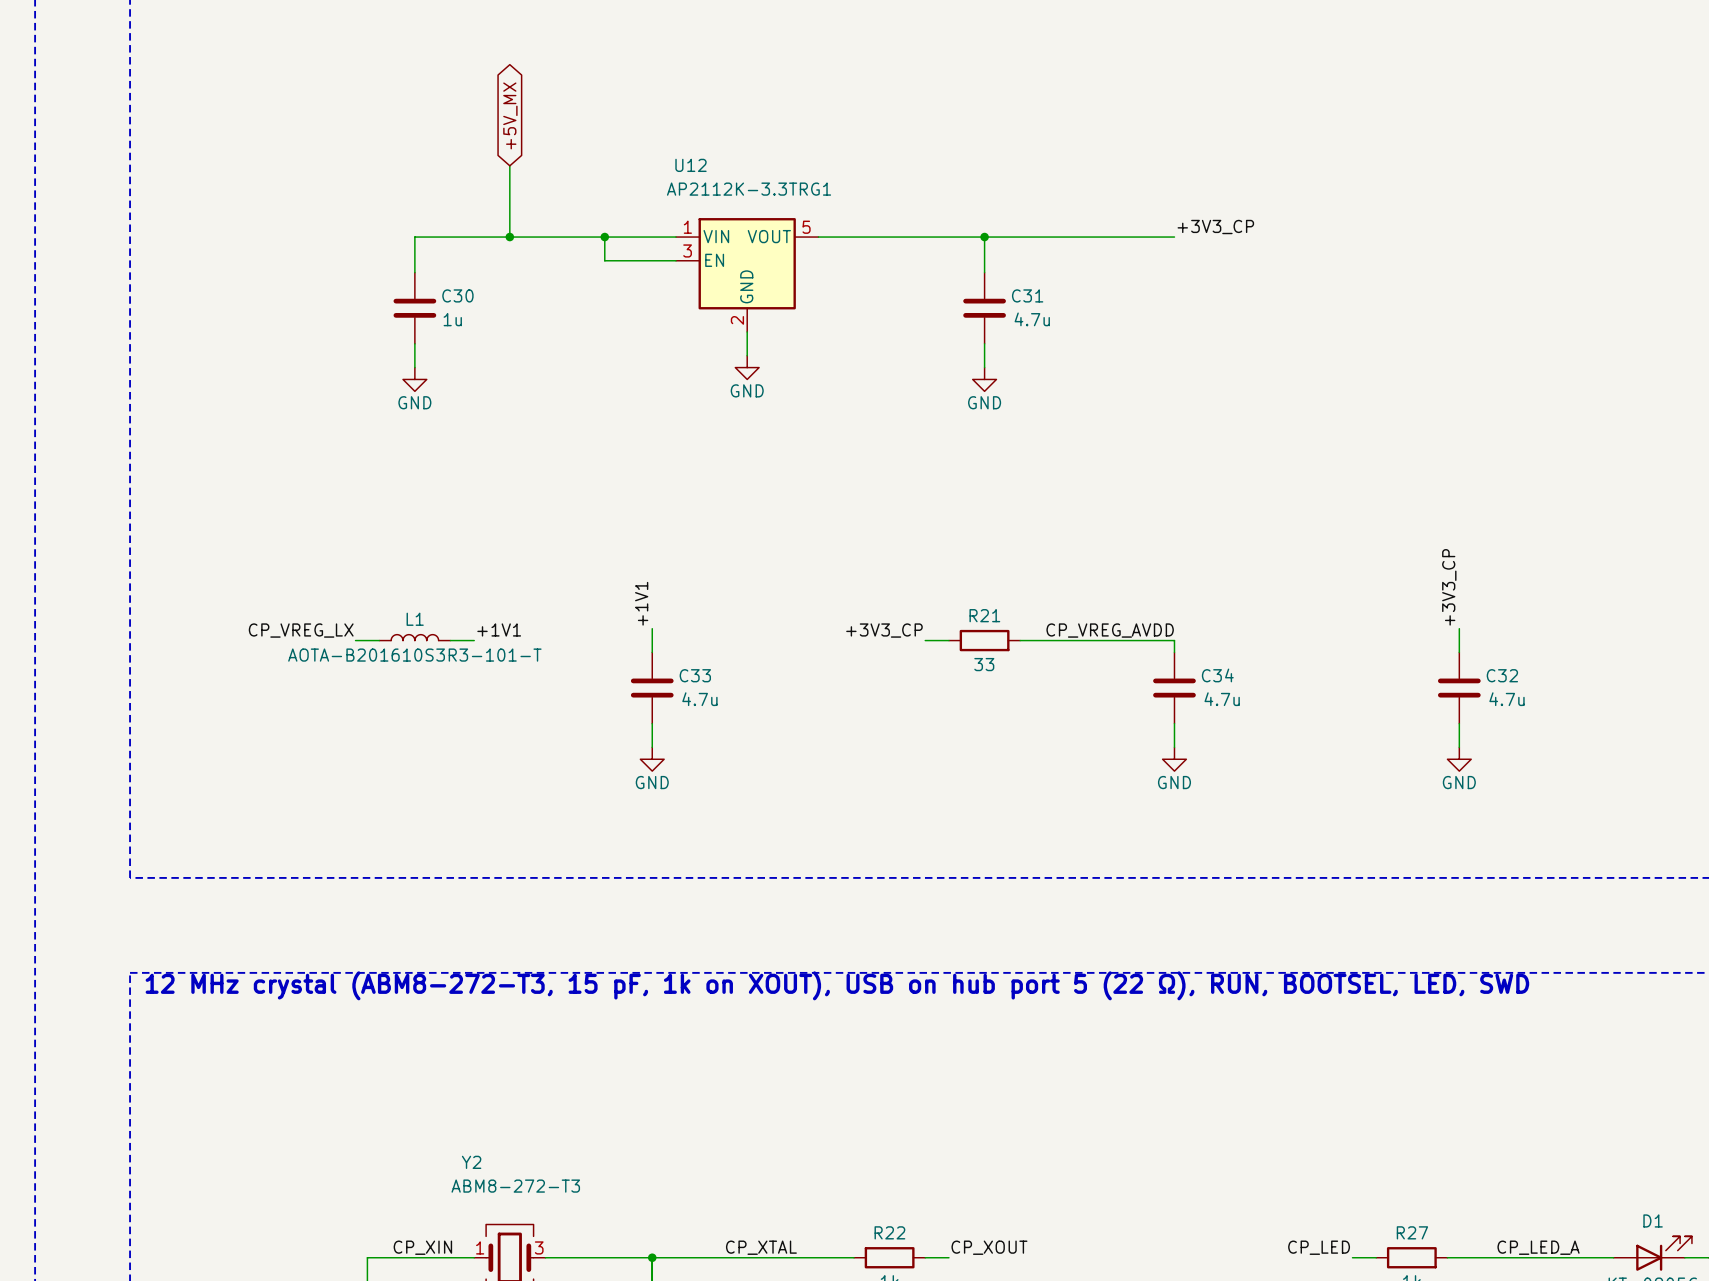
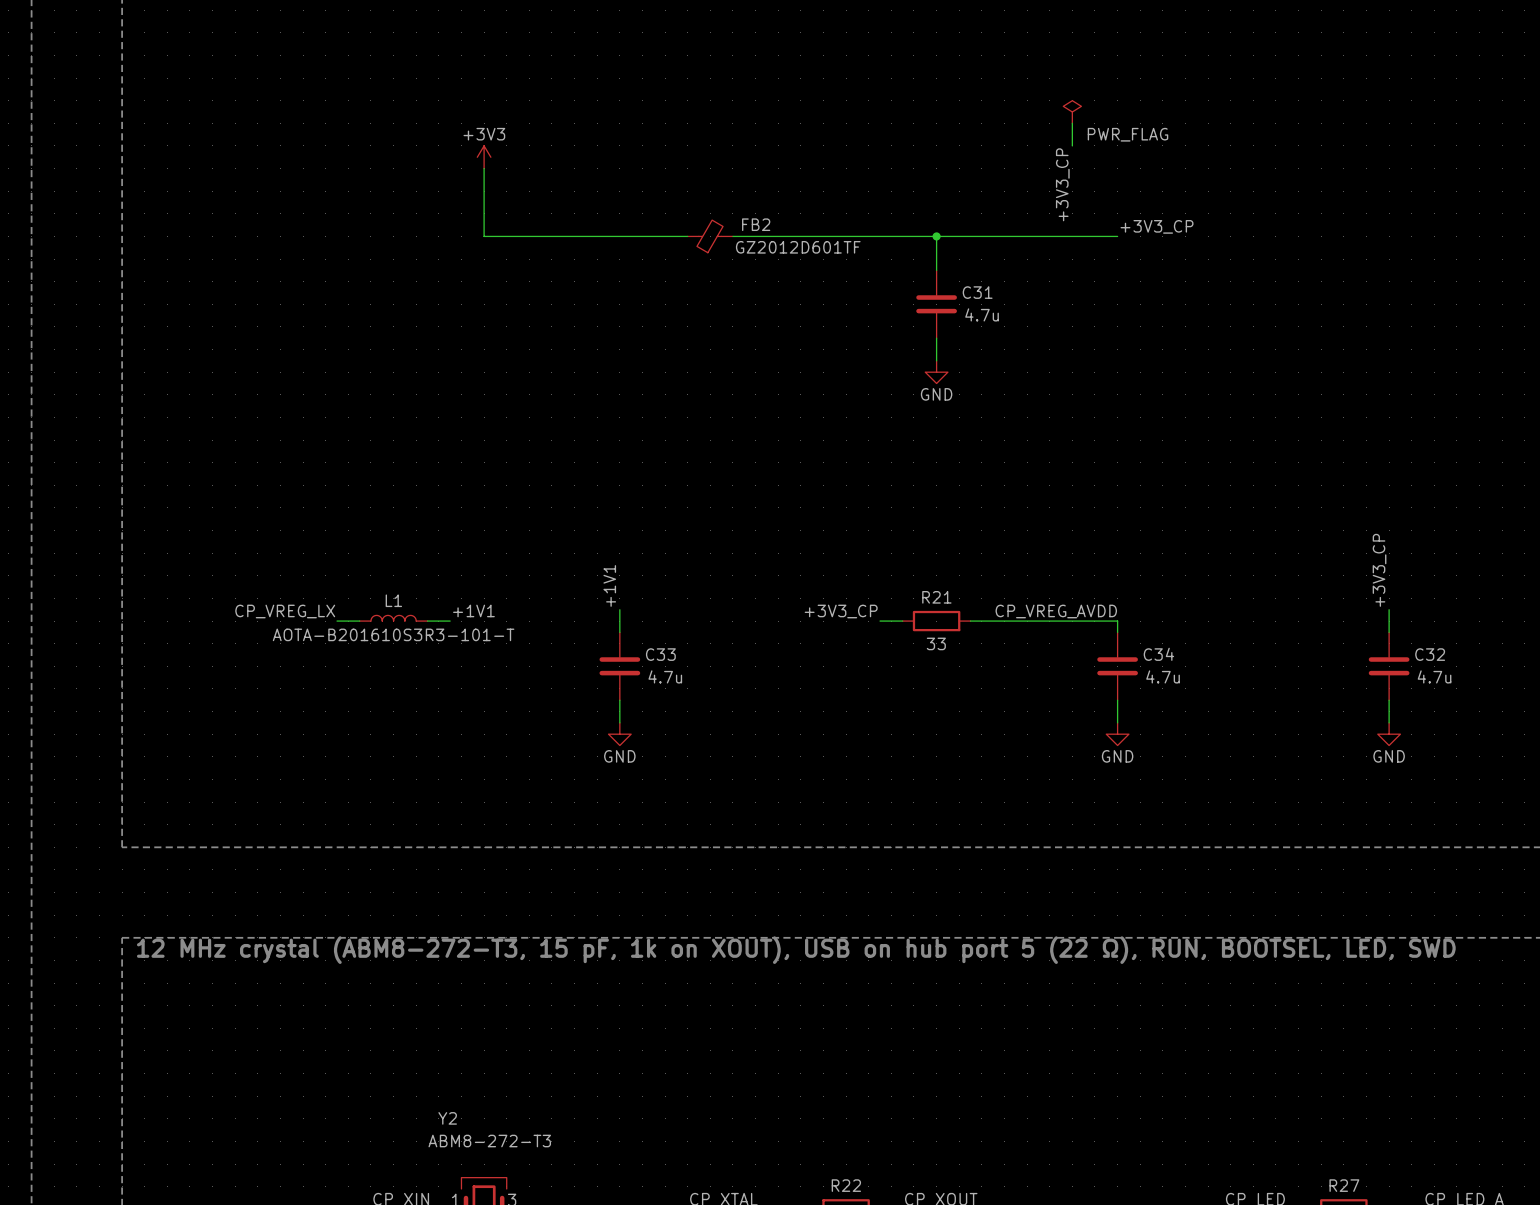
power symbol: none -> PWR_FLAG (1072, 111)
global label: +5V_MX (510, 115) -> none
wire: none -> (1072, 123) (1072, 145)
power symbol: none -> +3V3 (484, 157)
label: none -> +3V3_CP (1062, 184)
wire: (509, 237) (414, 237) (414, 272) -> none
junction: (509, 237) -> none
wire: (604, 237) (604, 260) (675, 260) -> none
junction: (604, 237) -> none
FB2: none -> GZ2012D601TF (710, 236)
U12: AP2112K-3.3TRG1 (747, 275) -> none
C30: 1u (414, 308) -> none
wire: (747, 331) (747, 355) -> none
wire: (414, 343) (414, 367) -> none
power symbol: GND (747, 367) -> none
power symbol: GND (414, 379) -> none

